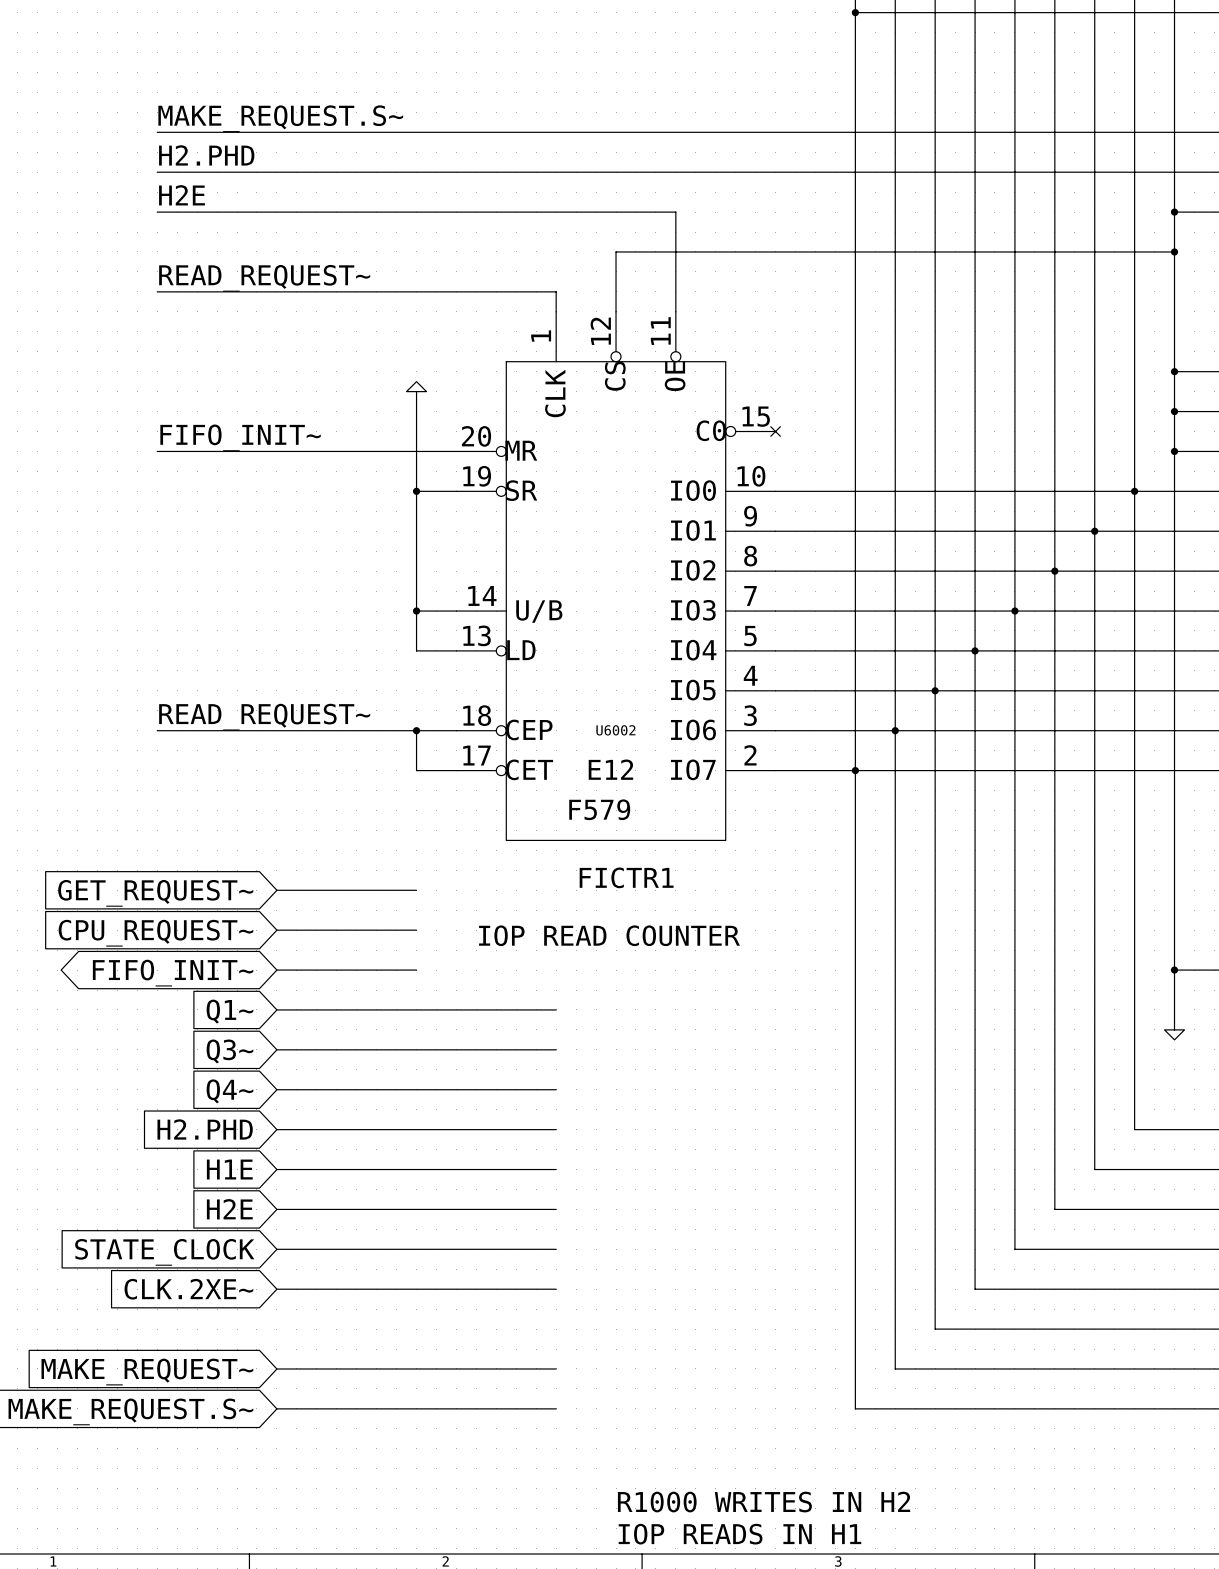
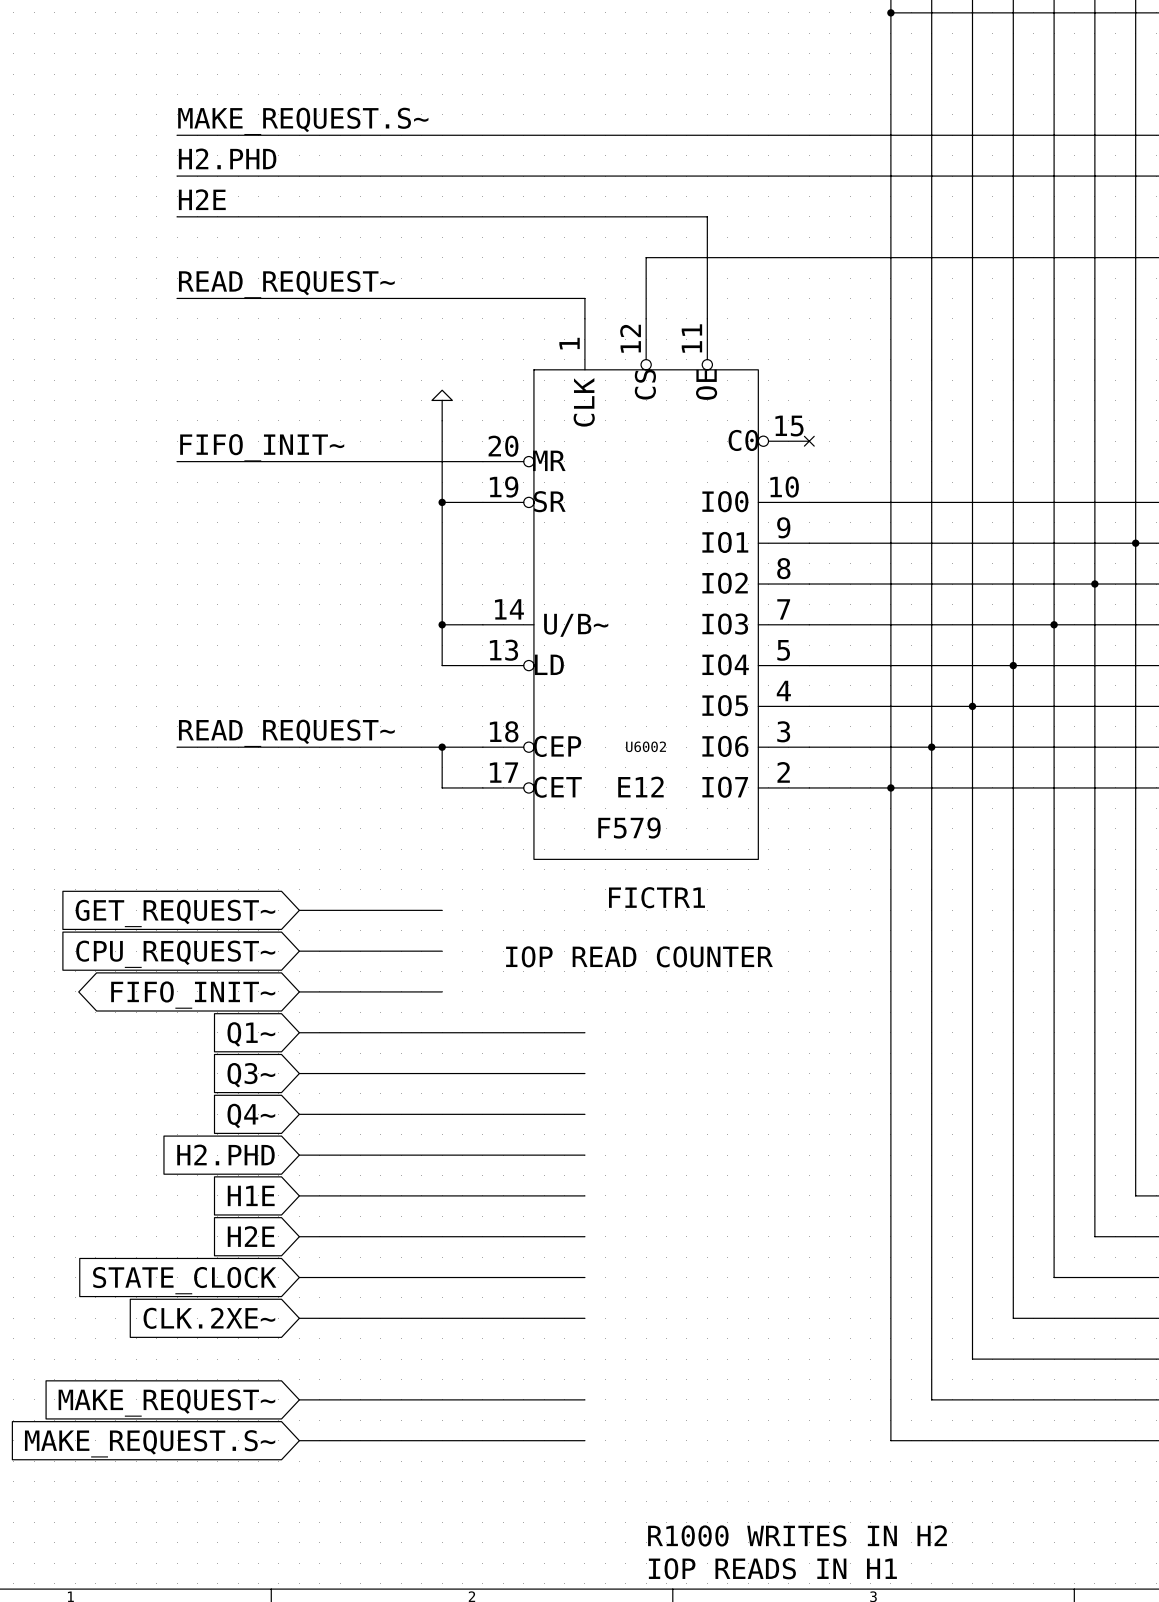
U6002 pin name: U/B (539, 611) -> U/B~ (576, 625)

